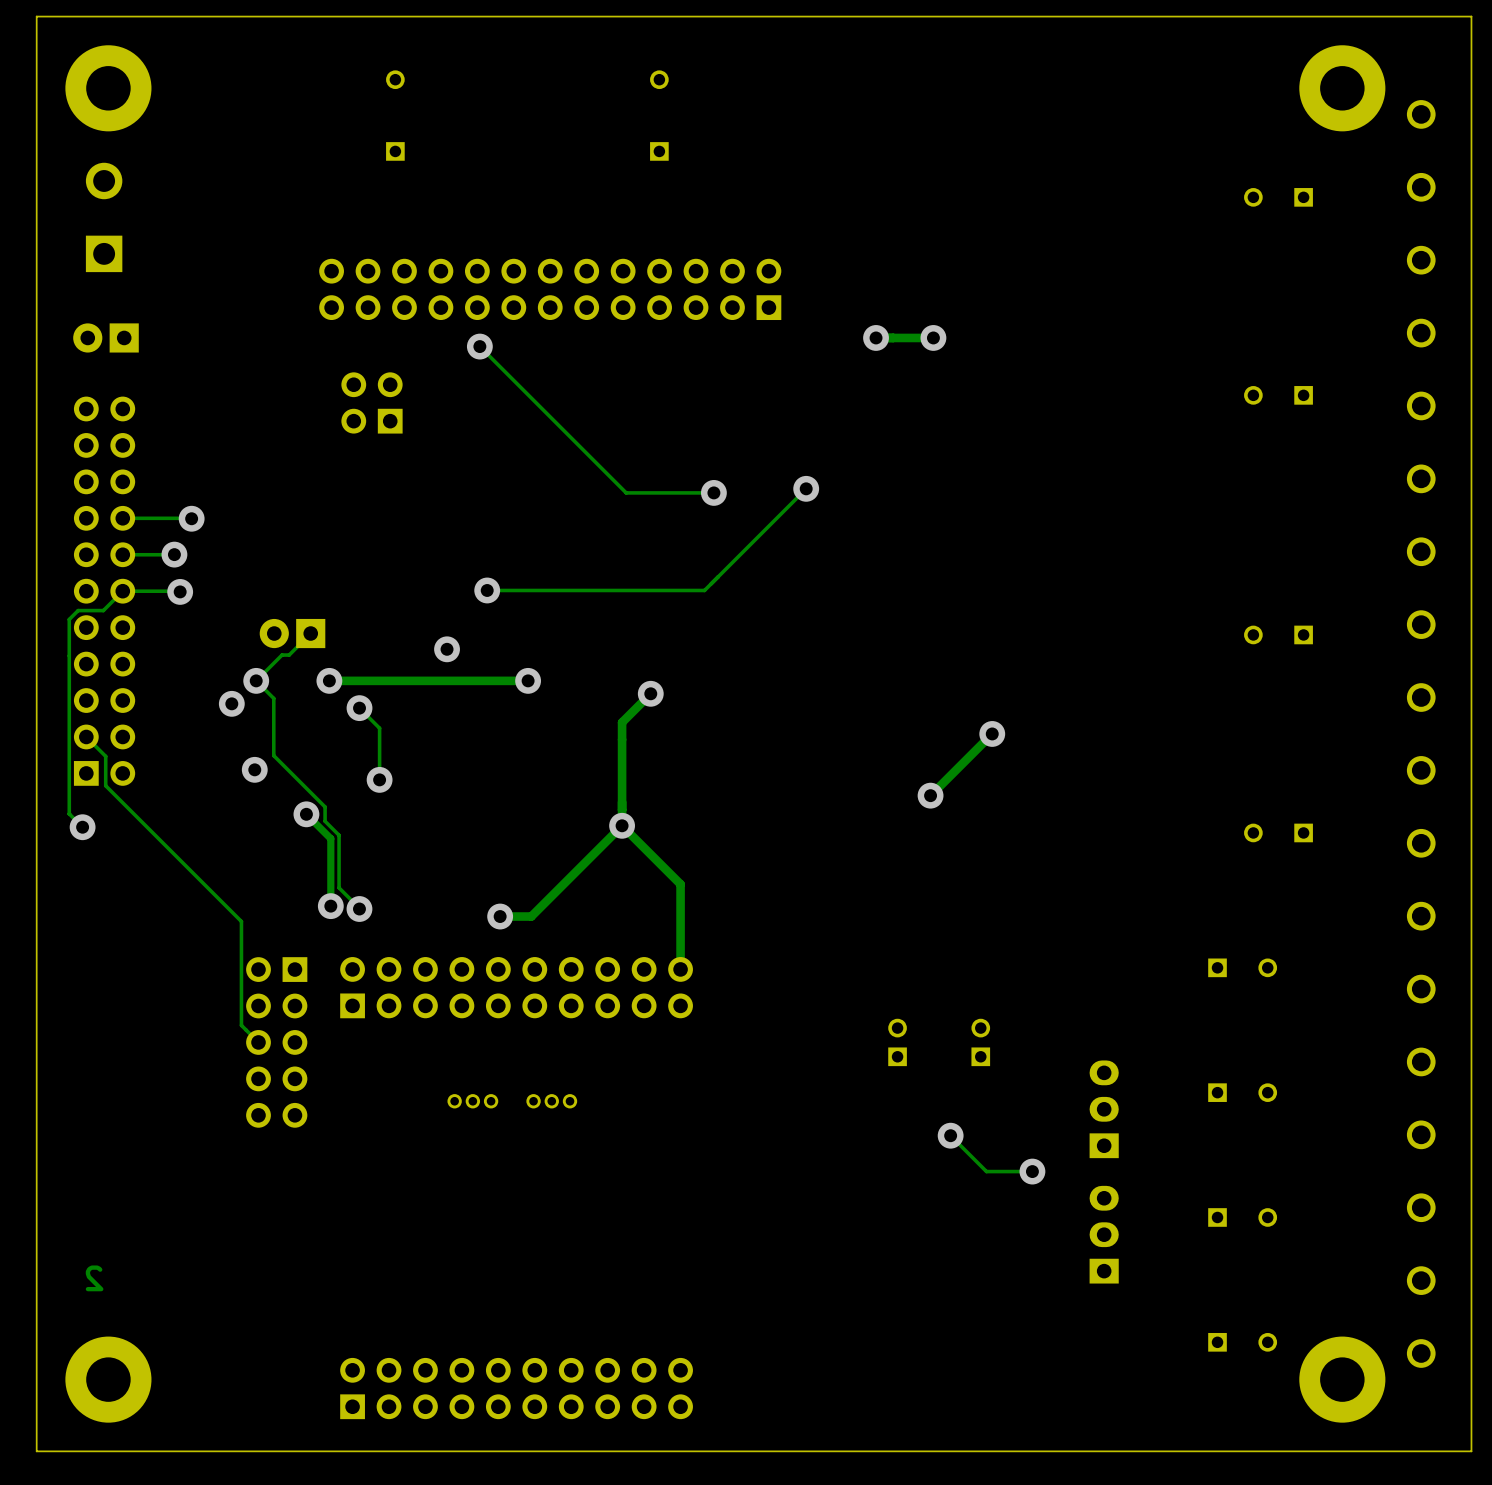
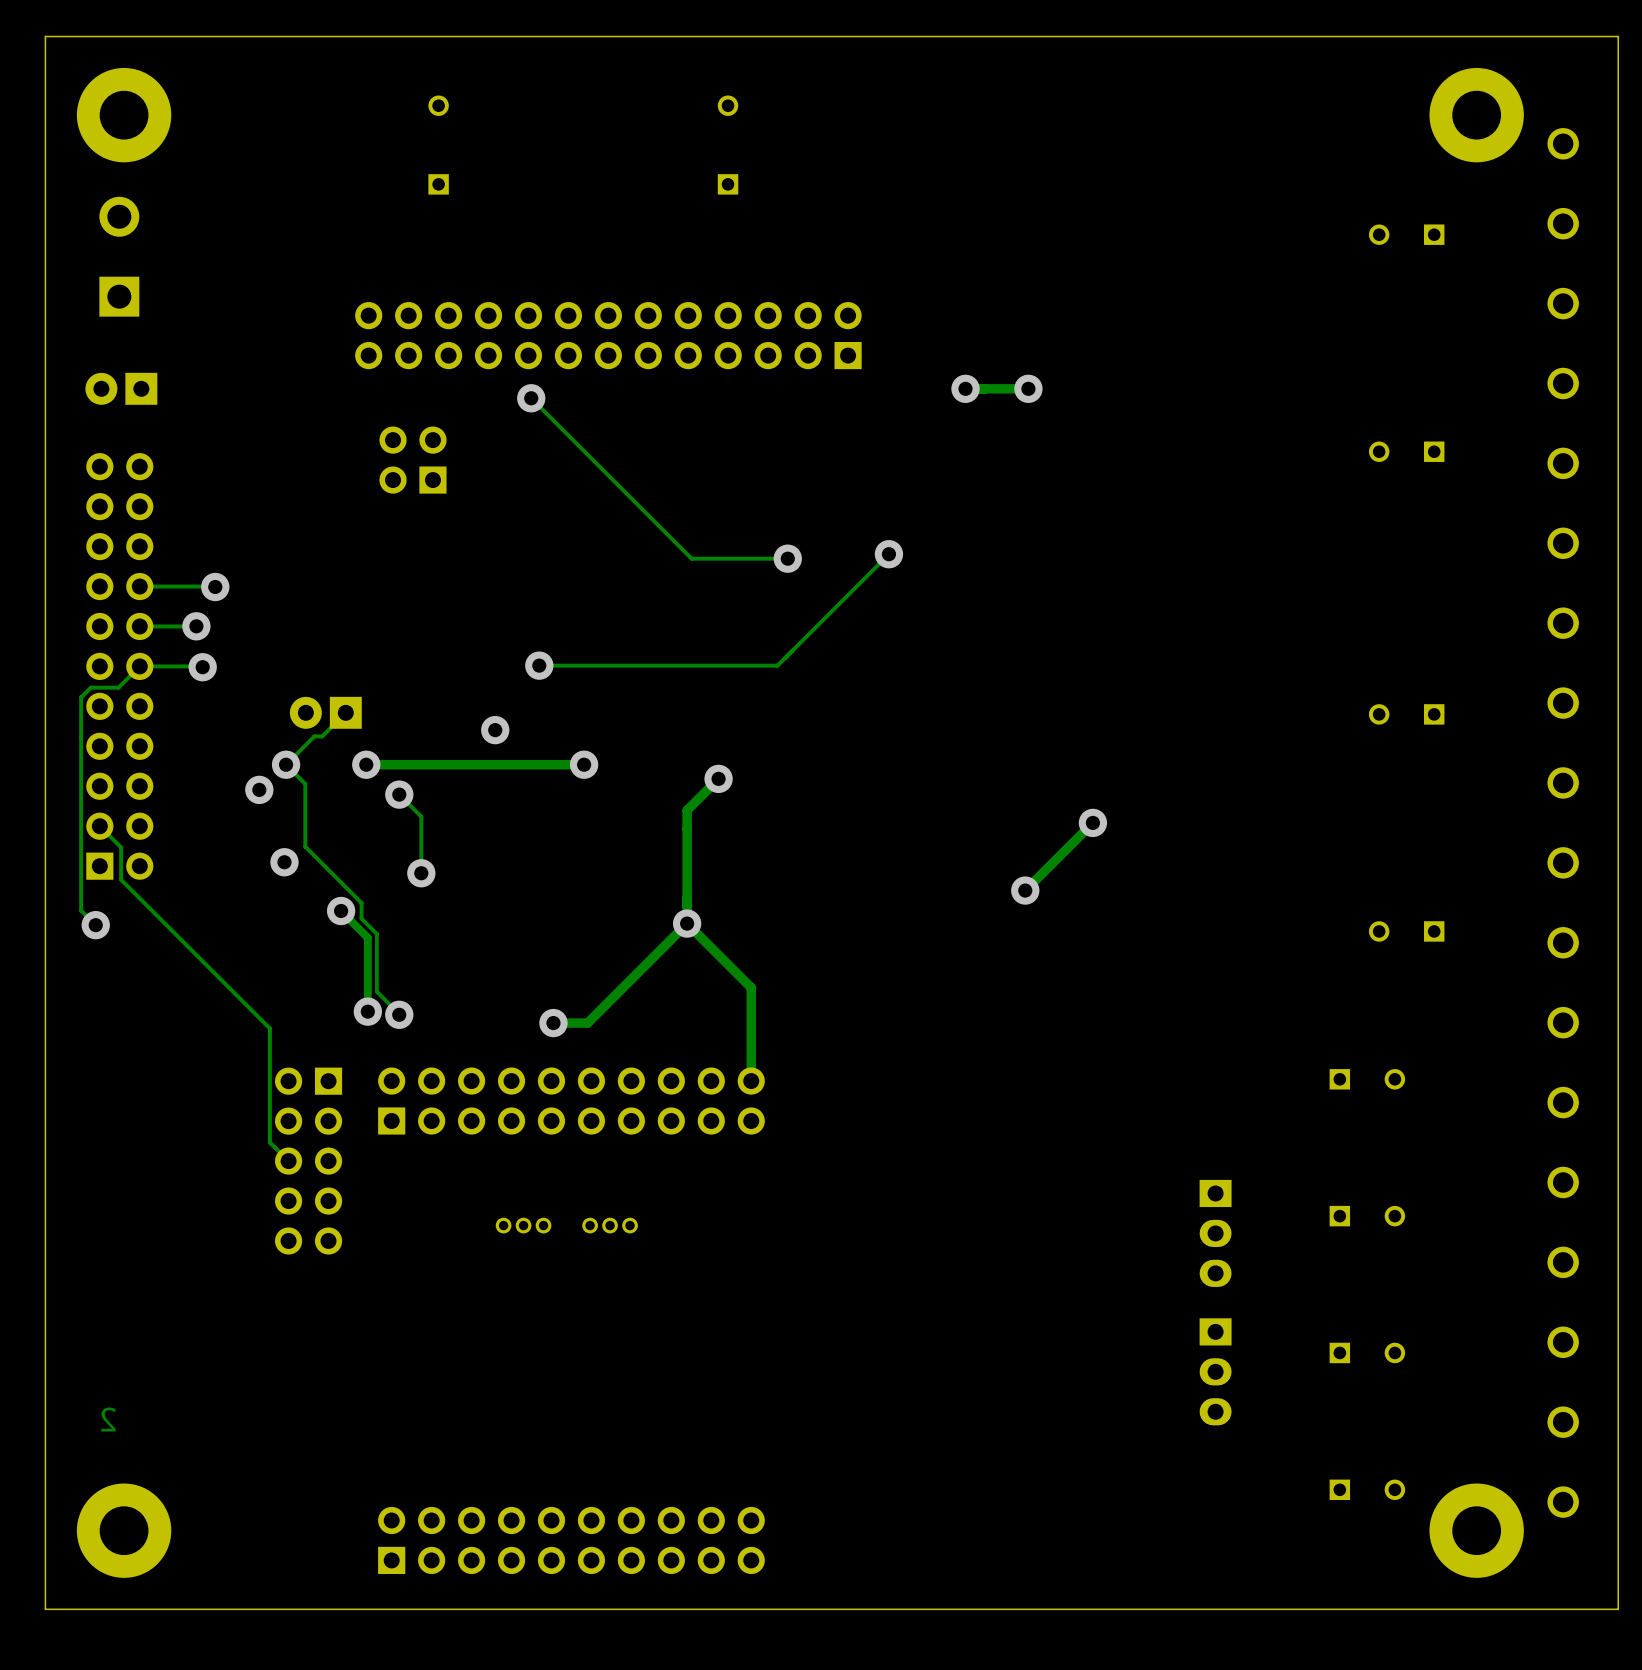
part: (897, 1042) -> none
part: (980, 1042) -> none
part rotation: 0° (1104, 1109) -> 180° (1215, 1233)
track: (950, 1135) (986, 1171) (1032, 1171) -> none
via: (950, 1135) -> none
via: (1032, 1171) -> none
part rotation: 0° (1104, 1234) -> 180° (1215, 1371)

